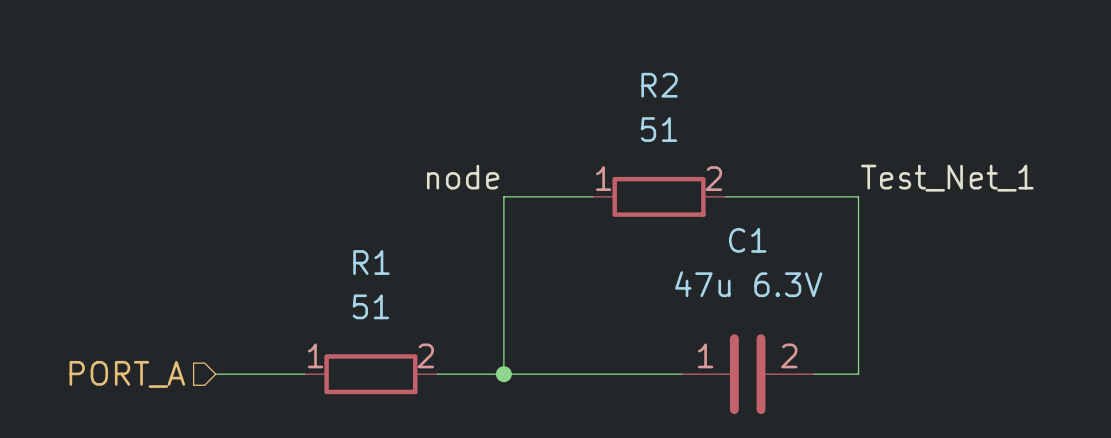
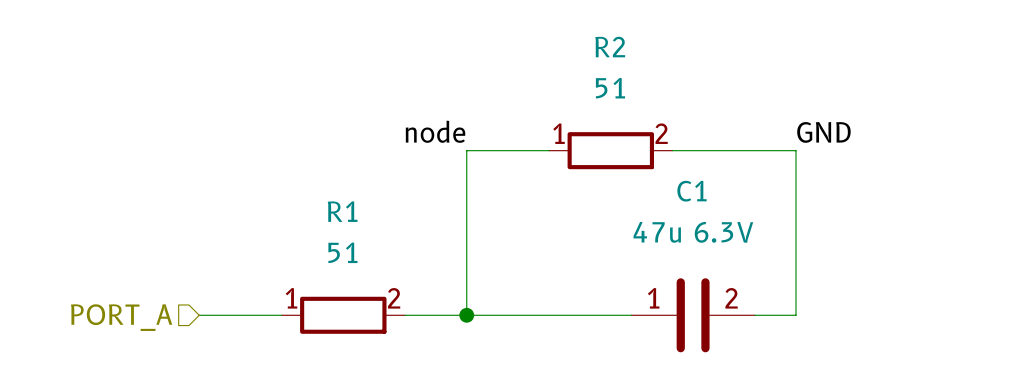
label: Test_Net_1 (947, 178) -> GND (823, 132)

